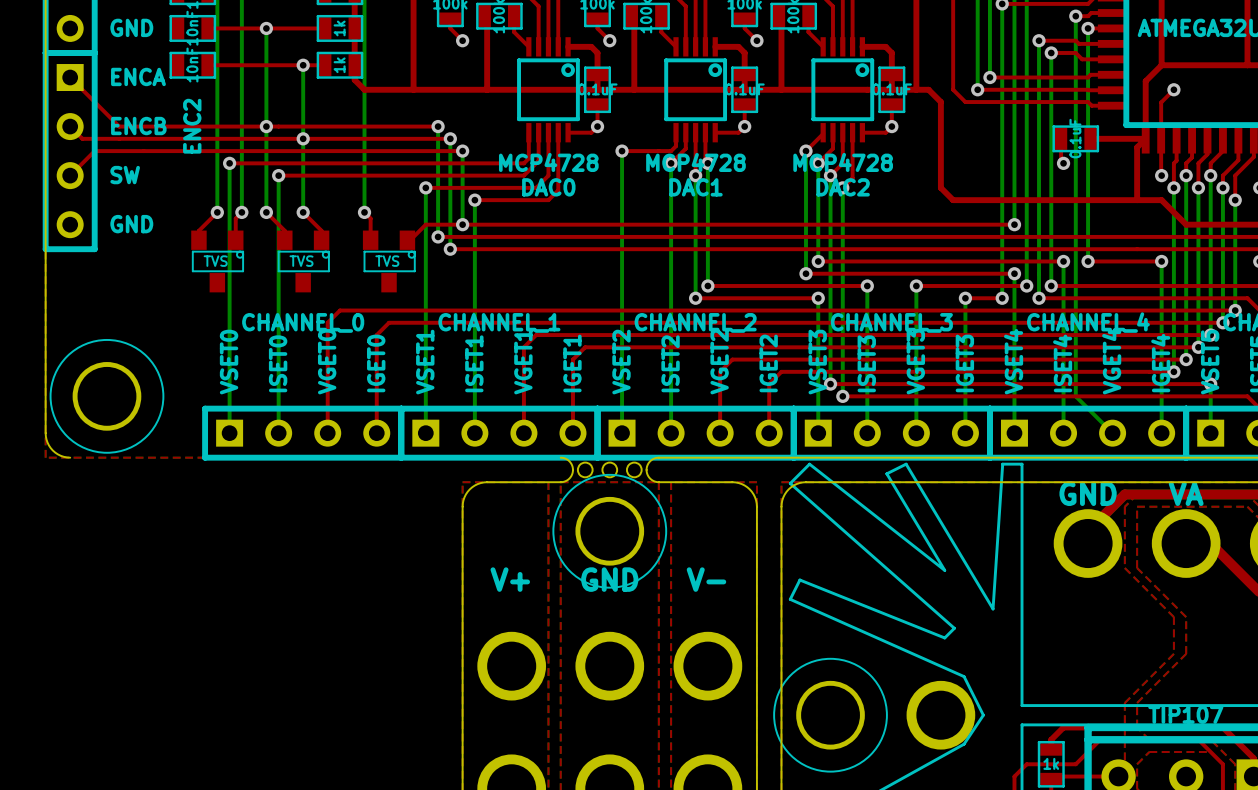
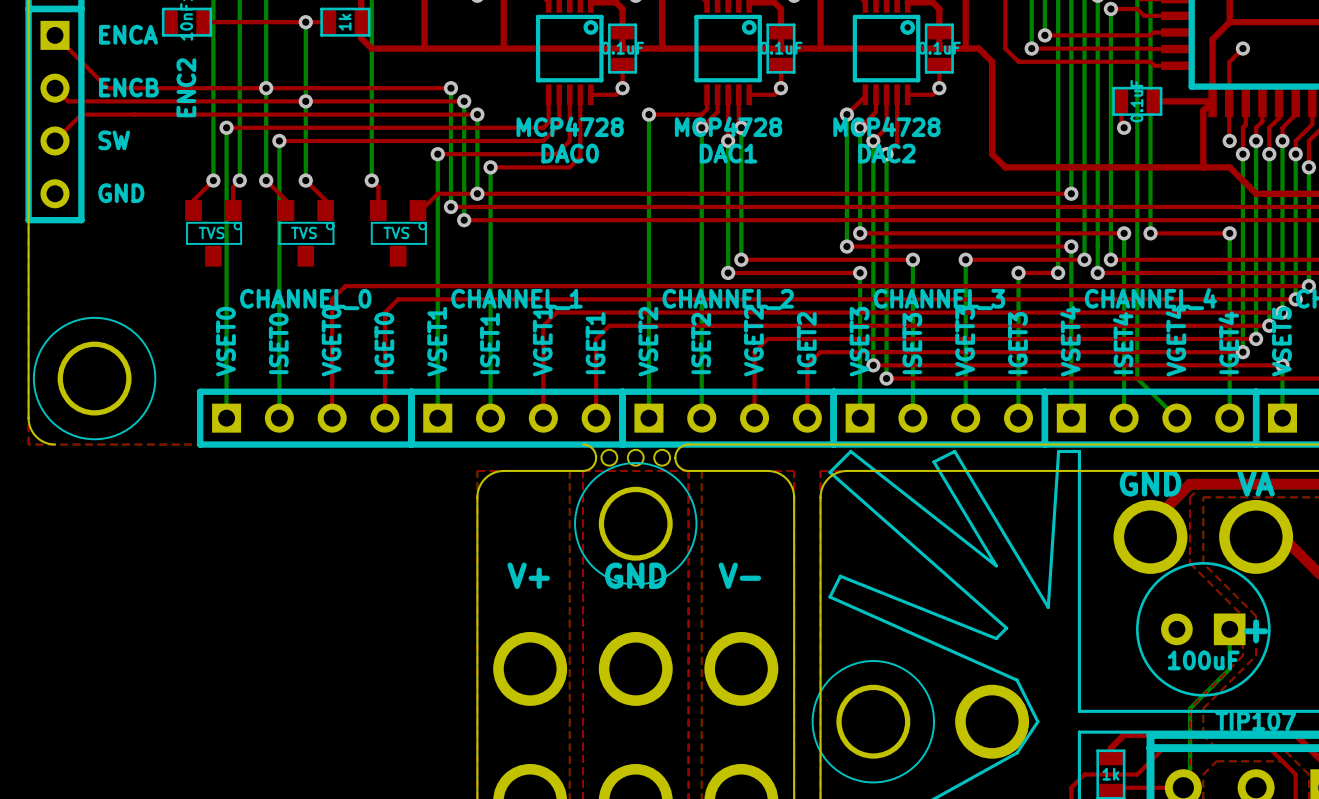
part: none -> 100uF (1203, 629)
bottom track: none -> (1229, 629) (1229, 668) (1190, 708) (1190, 780) (1183, 787)

